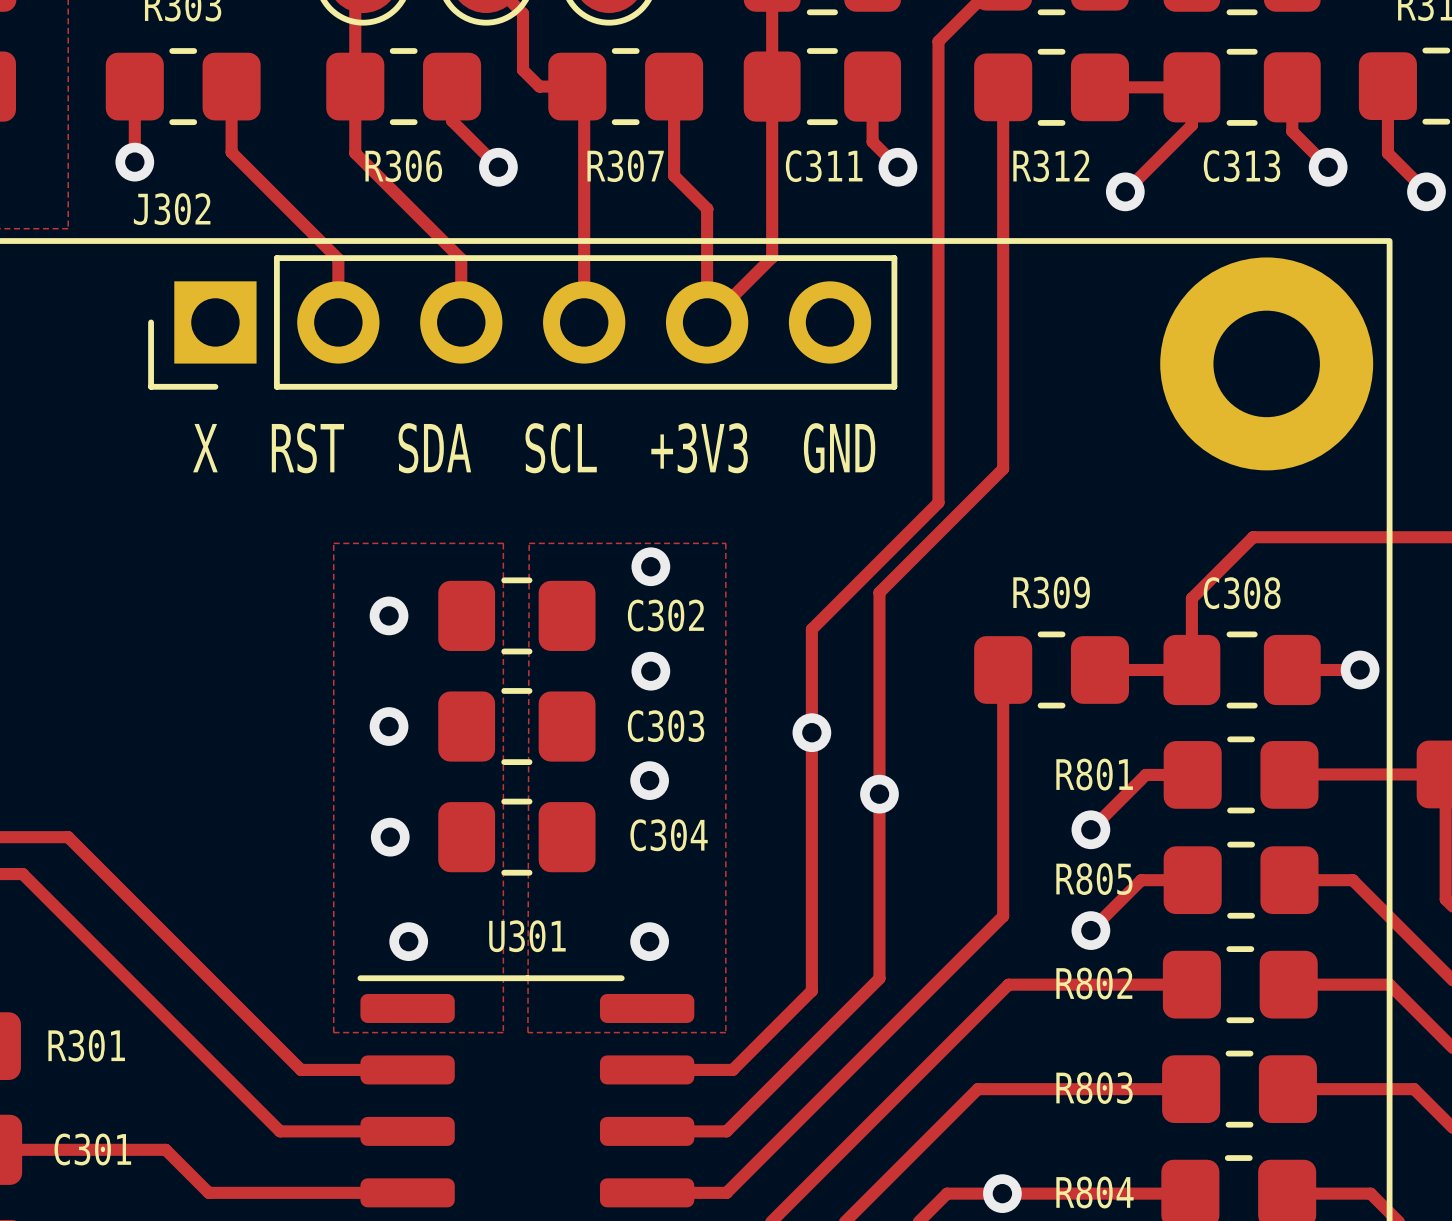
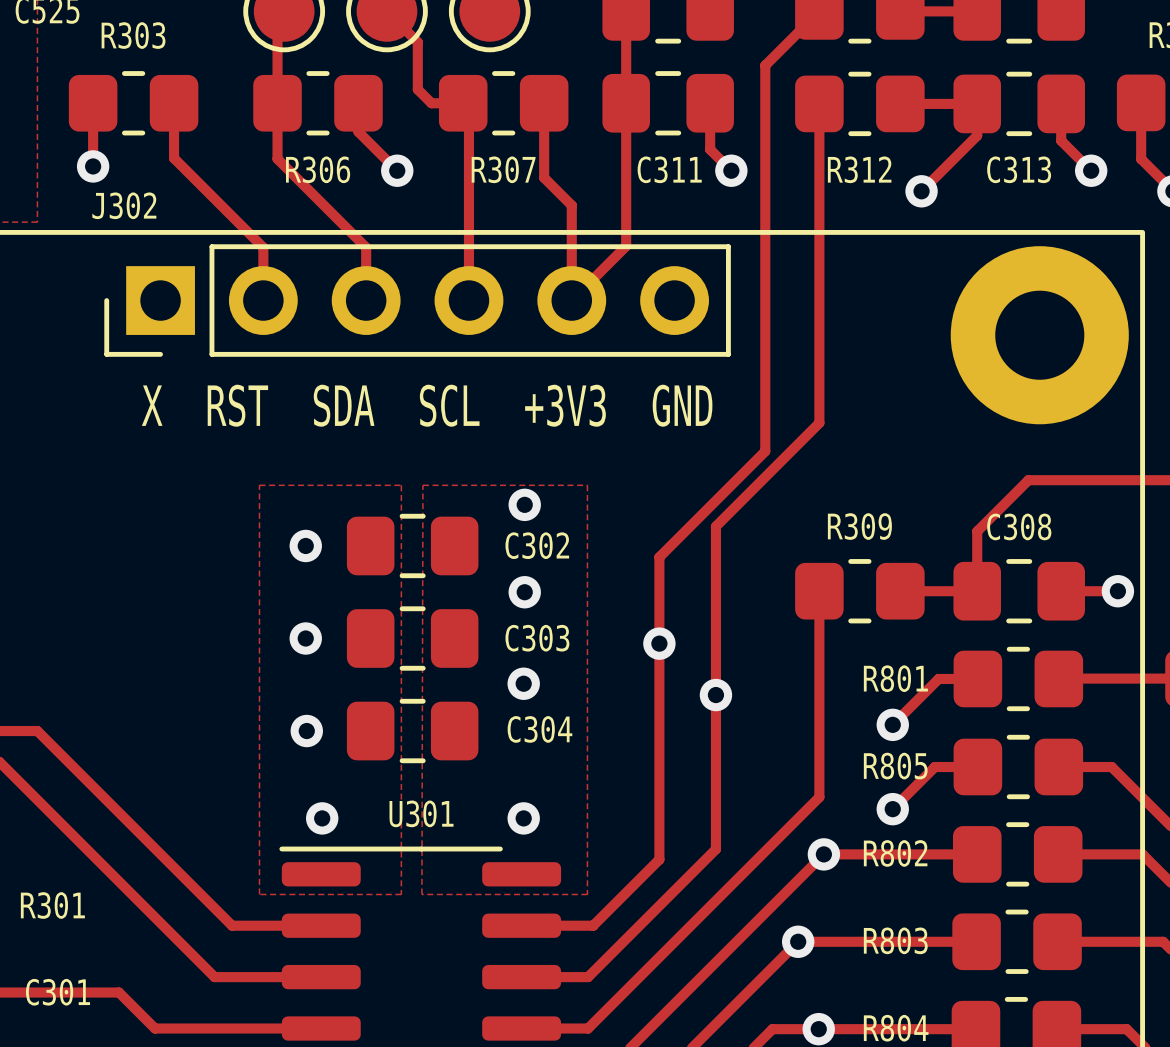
via: none -> (823, 854)
via: none -> (798, 941)

